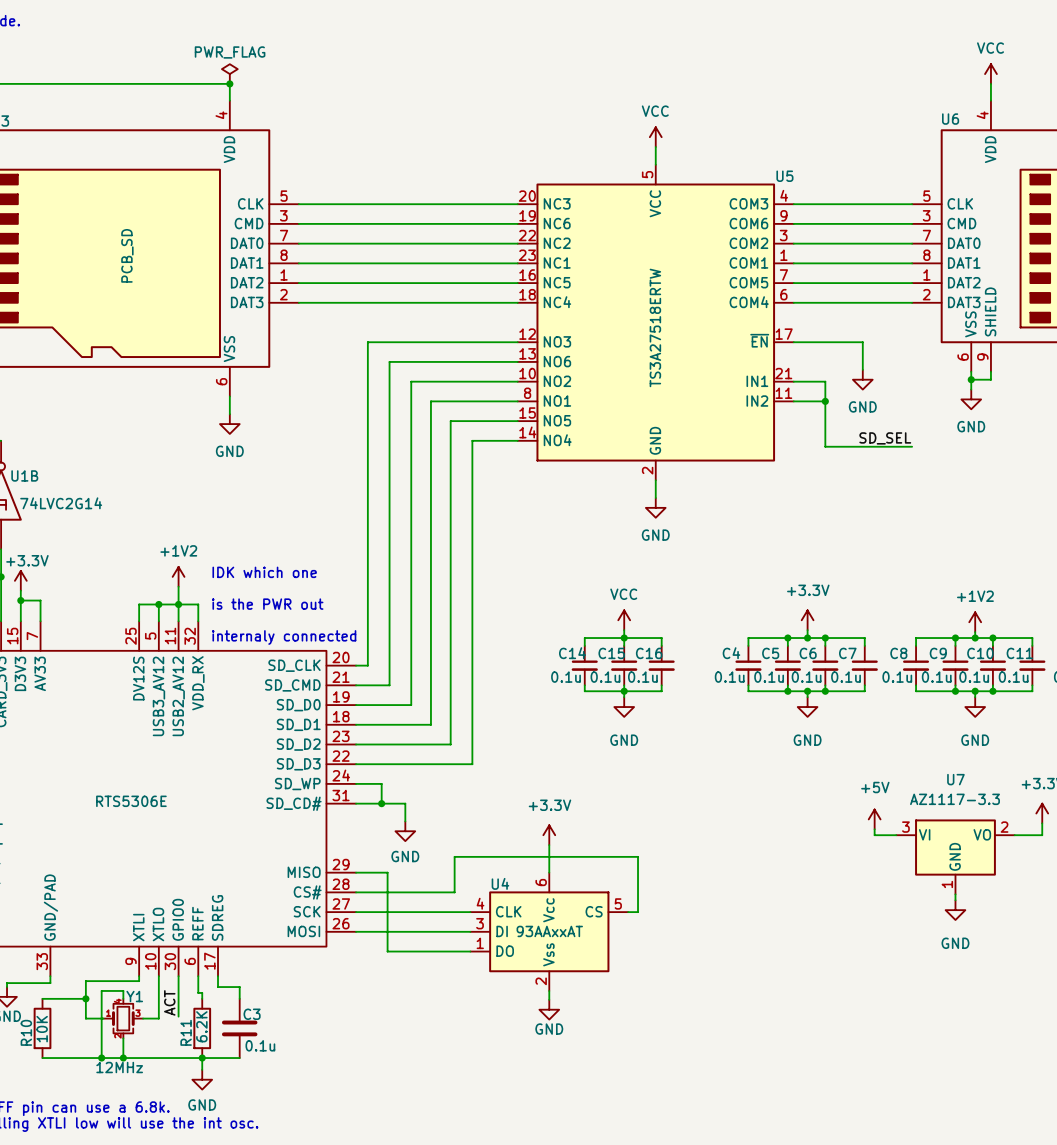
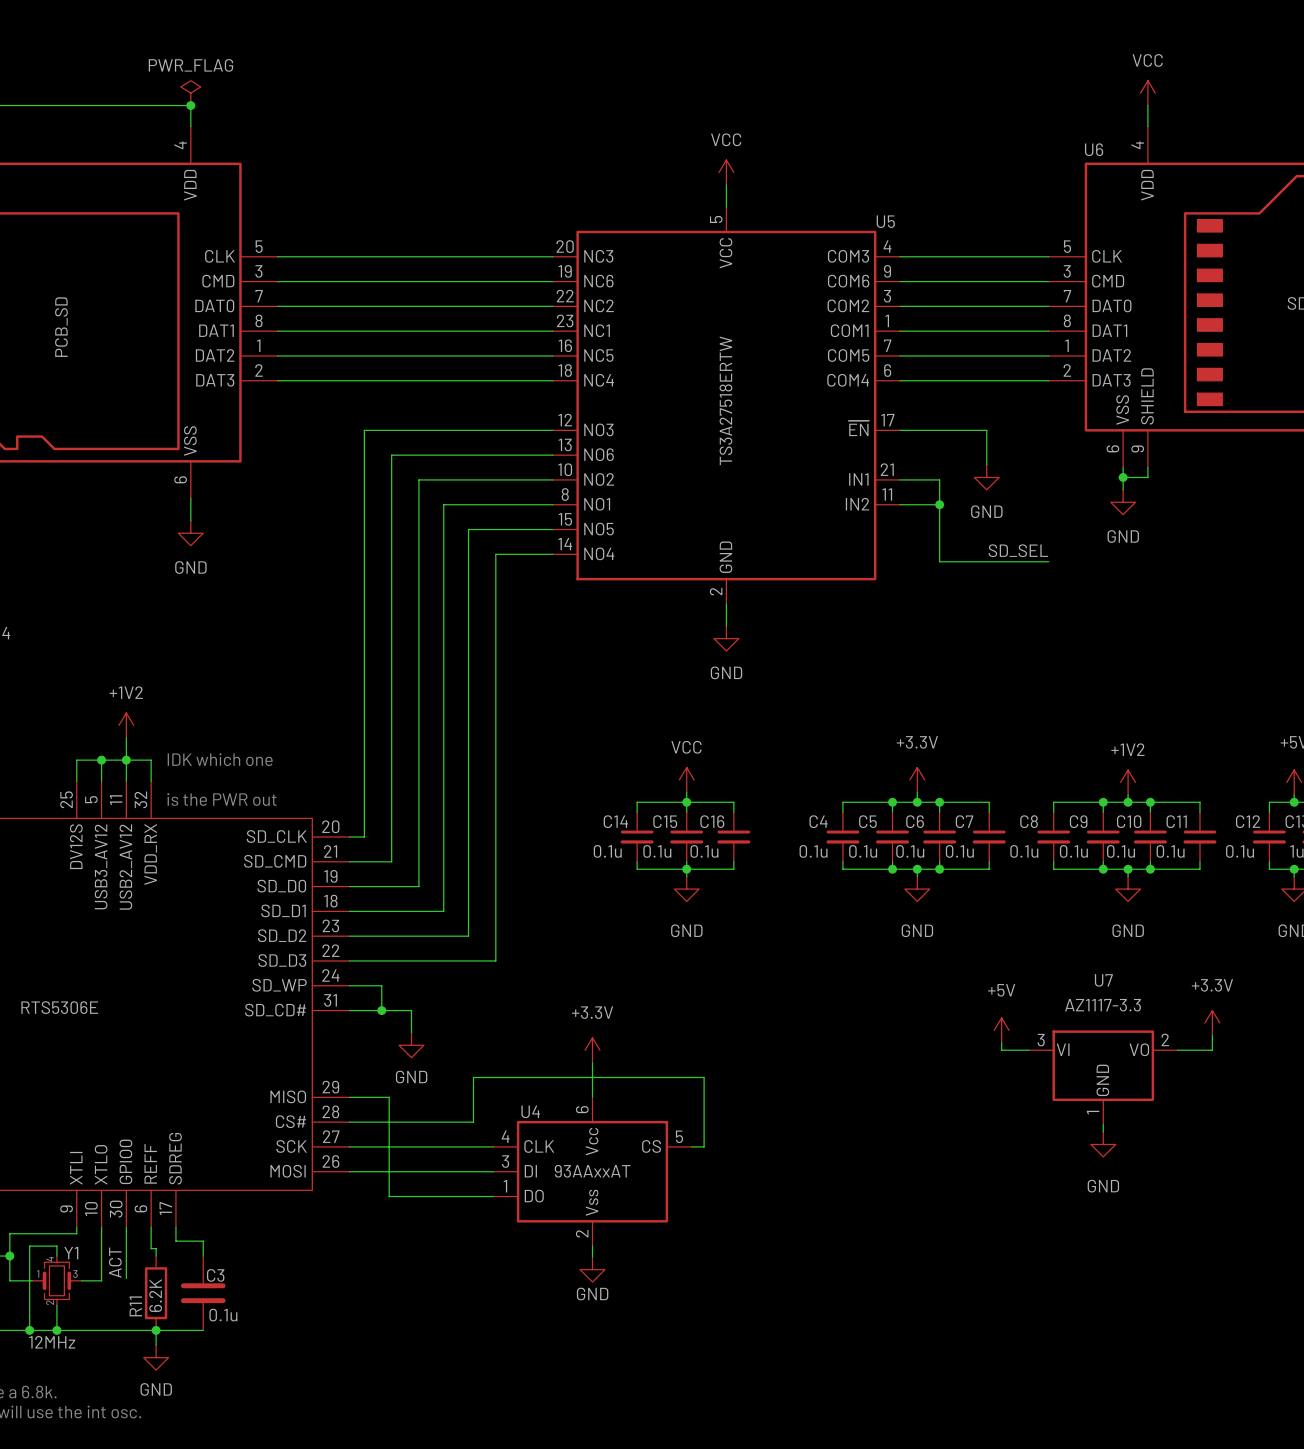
text: IDK which one (264, 572) -> none
text: is the PWR out (267, 604) -> IDK which one (220, 759)
text: internaly connected (284, 637) -> is the PWR out (221, 799)

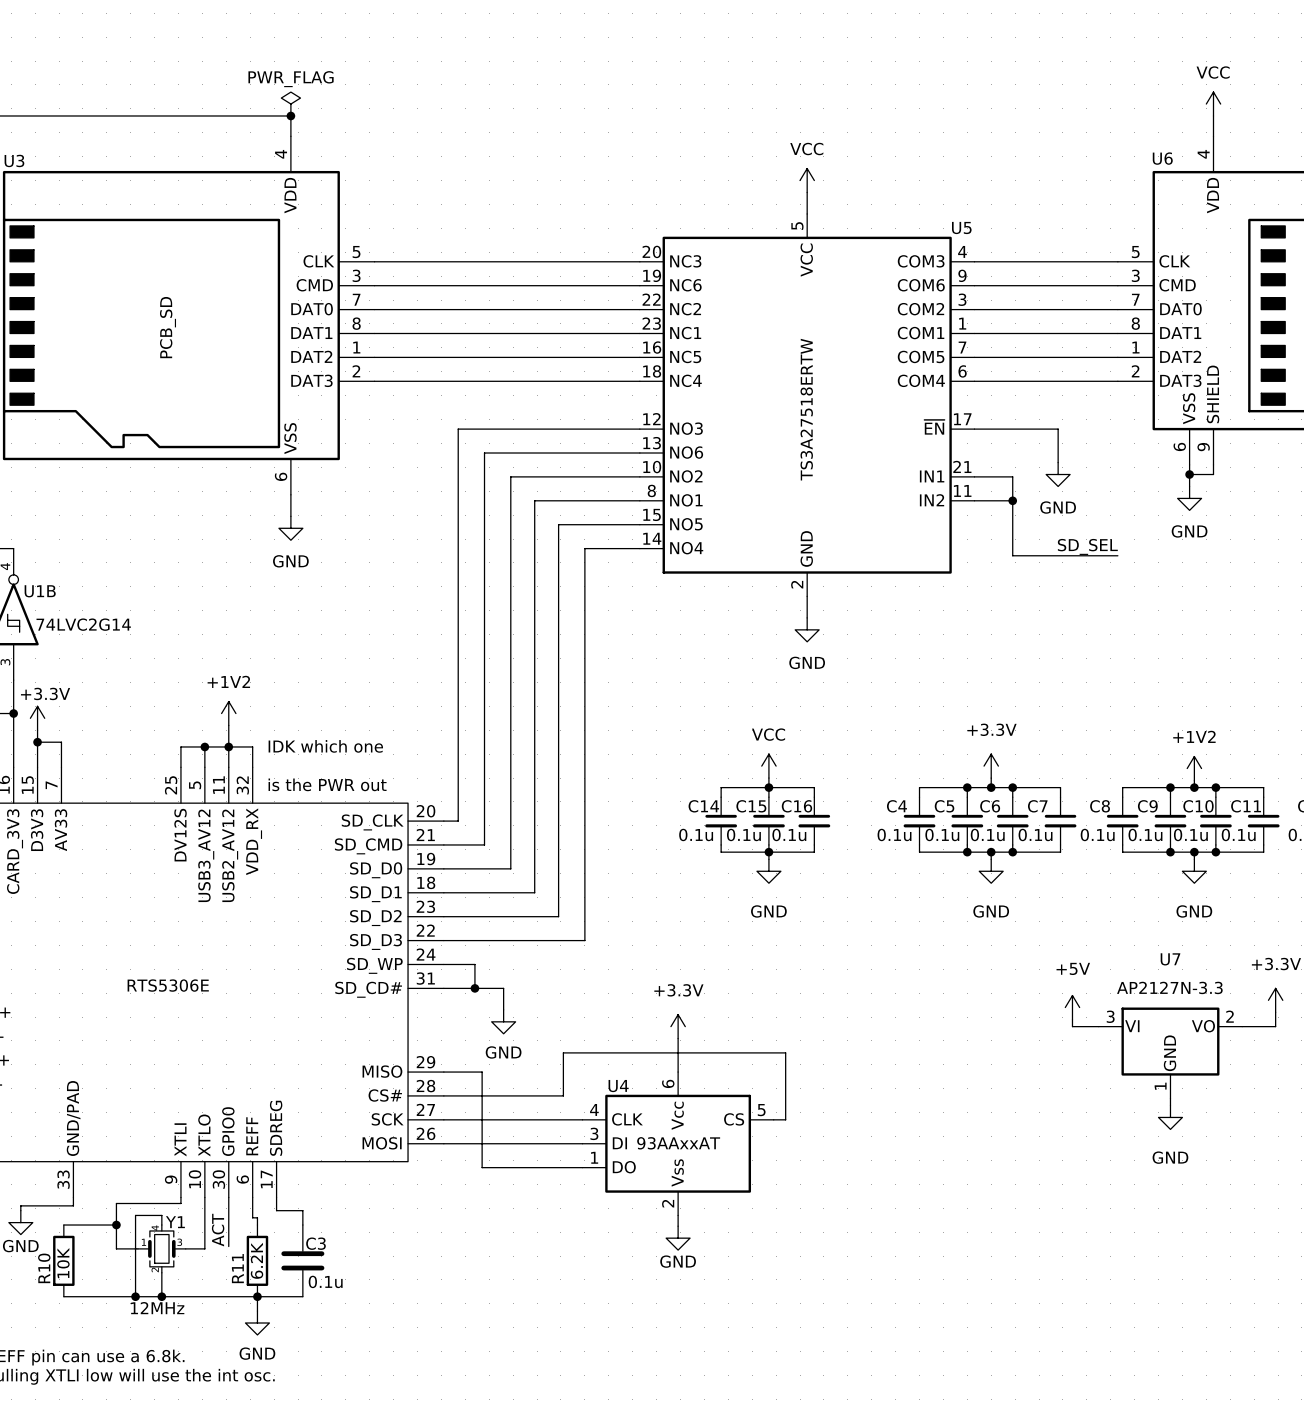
U7 value: AZ1117-3.3 (1103, 1005) -> AP2127N-3.3 (1169, 987)

